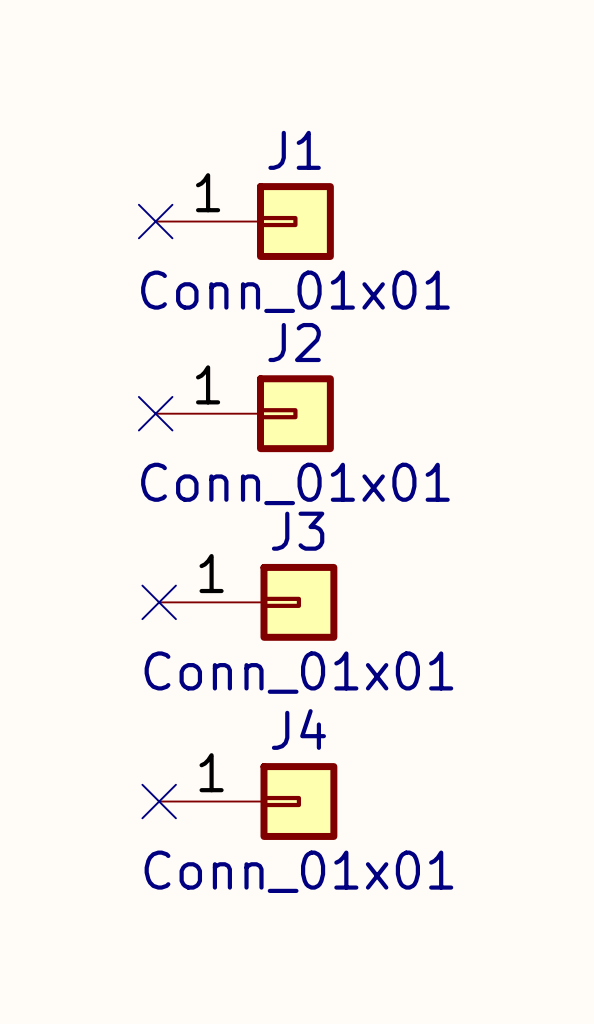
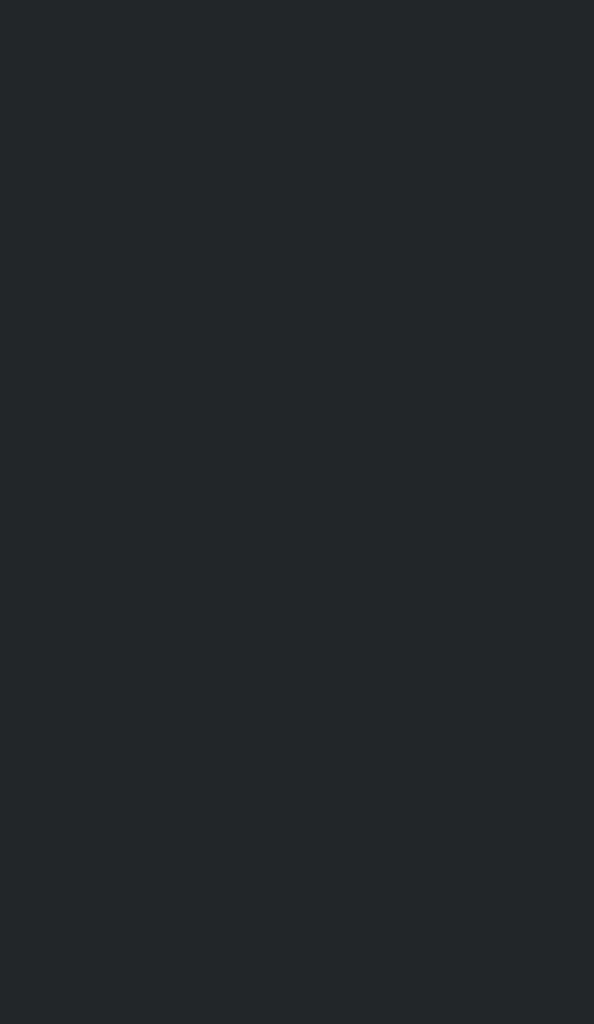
no-connect mark: (155, 221) -> none
J1: Conn_01x01 (244, 221) -> none
no-connect mark: (155, 413) -> none
J2: Conn_01x01 (244, 413) -> none
no-connect mark: (159, 602) -> none
J3: Conn_01x01 (248, 602) -> none
no-connect mark: (159, 801) -> none
J4: Conn_01x01 (248, 801) -> none

